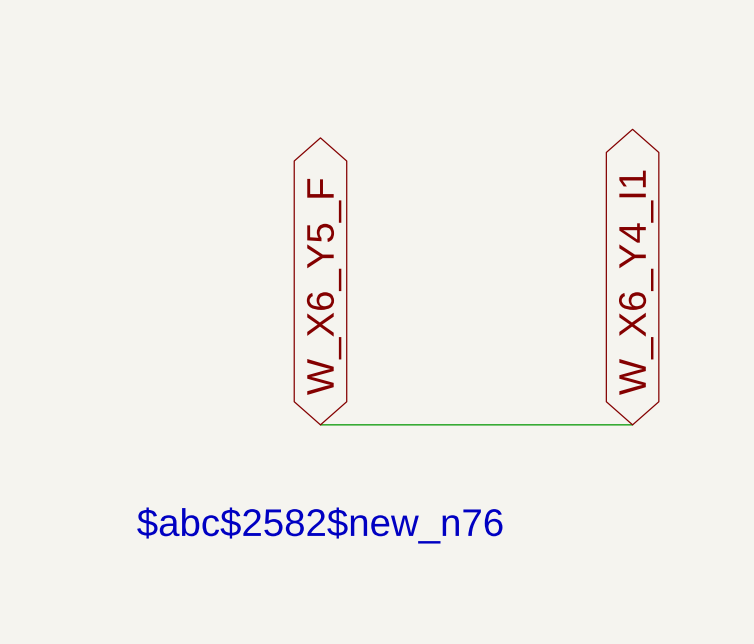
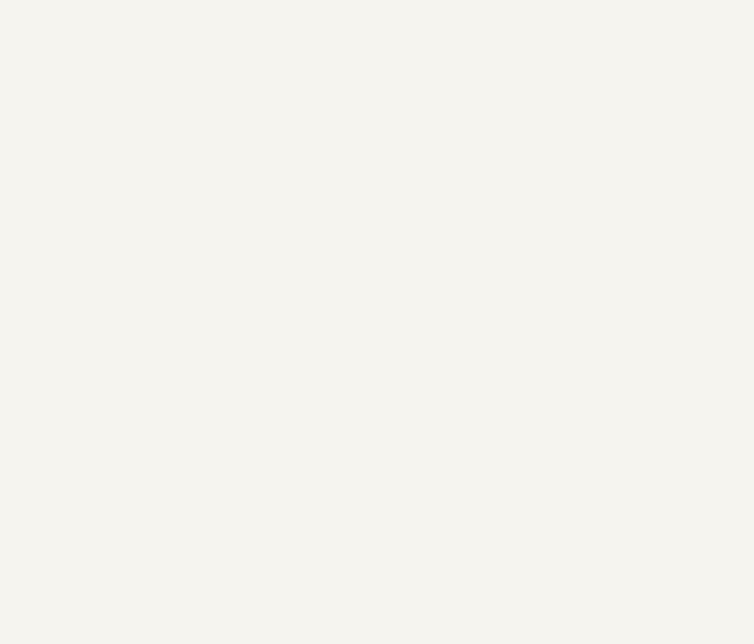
global label: W_X6_Y4_I1 (636, 282) -> none
global label: W_X6_Y5_F (324, 286) -> none
wire: (320, 424) (632, 424) -> none
text: $abc$2582$new_n76 (319, 525) -> none

